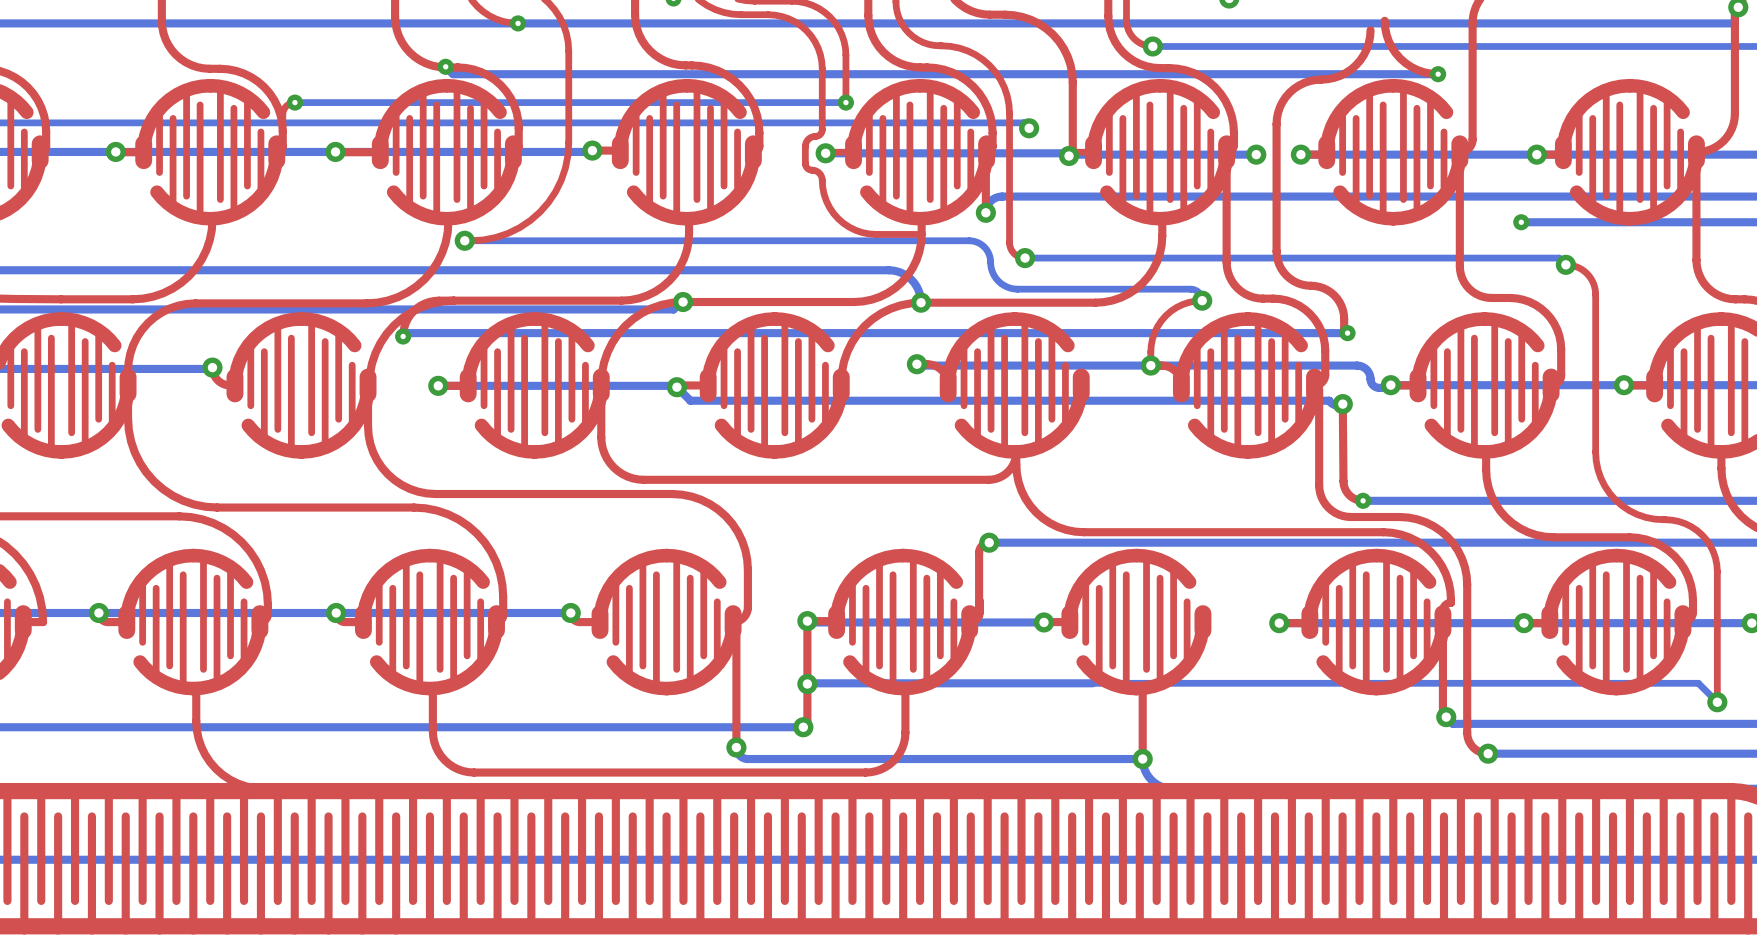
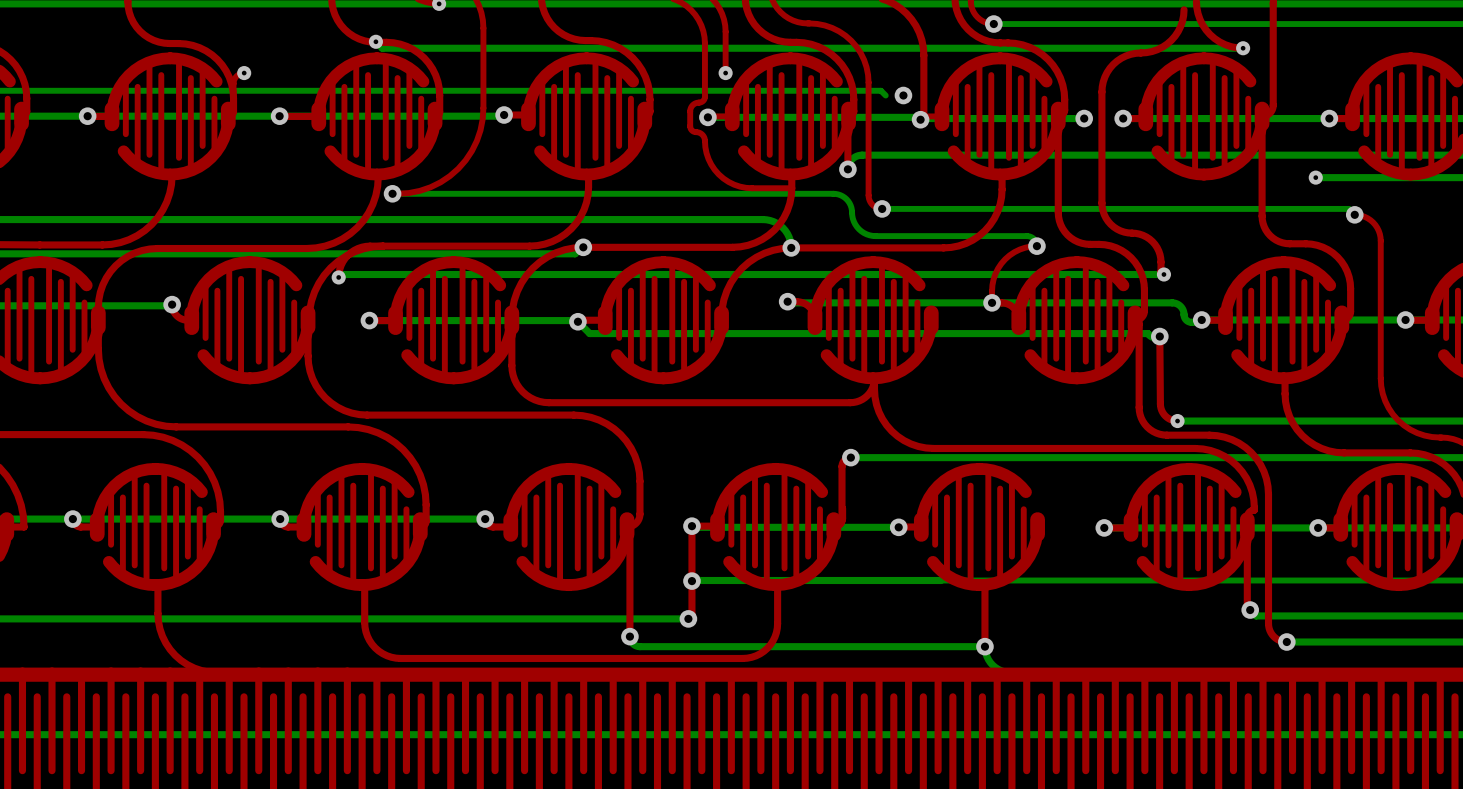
bottom track: (294, 102) (845, 102) -> none
via position: (1029, 128) -> (903, 95)

